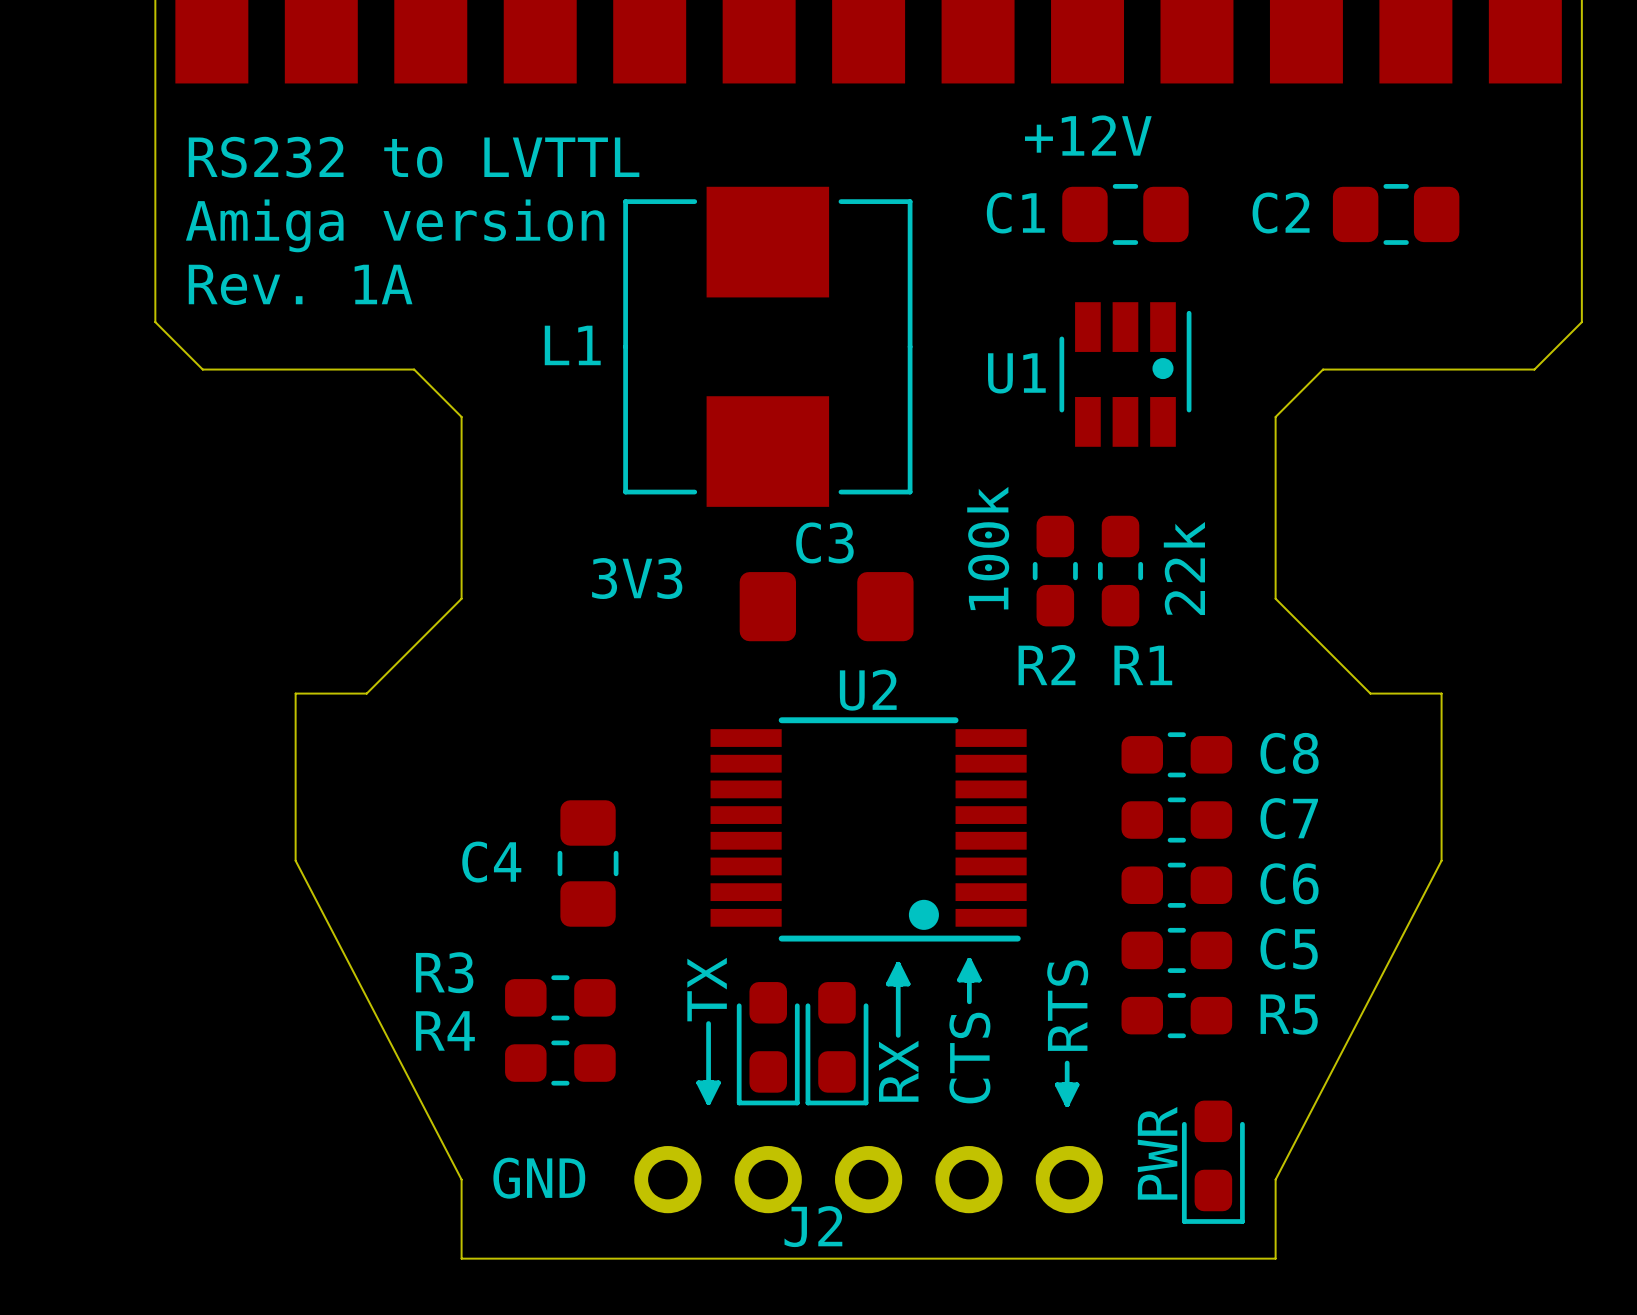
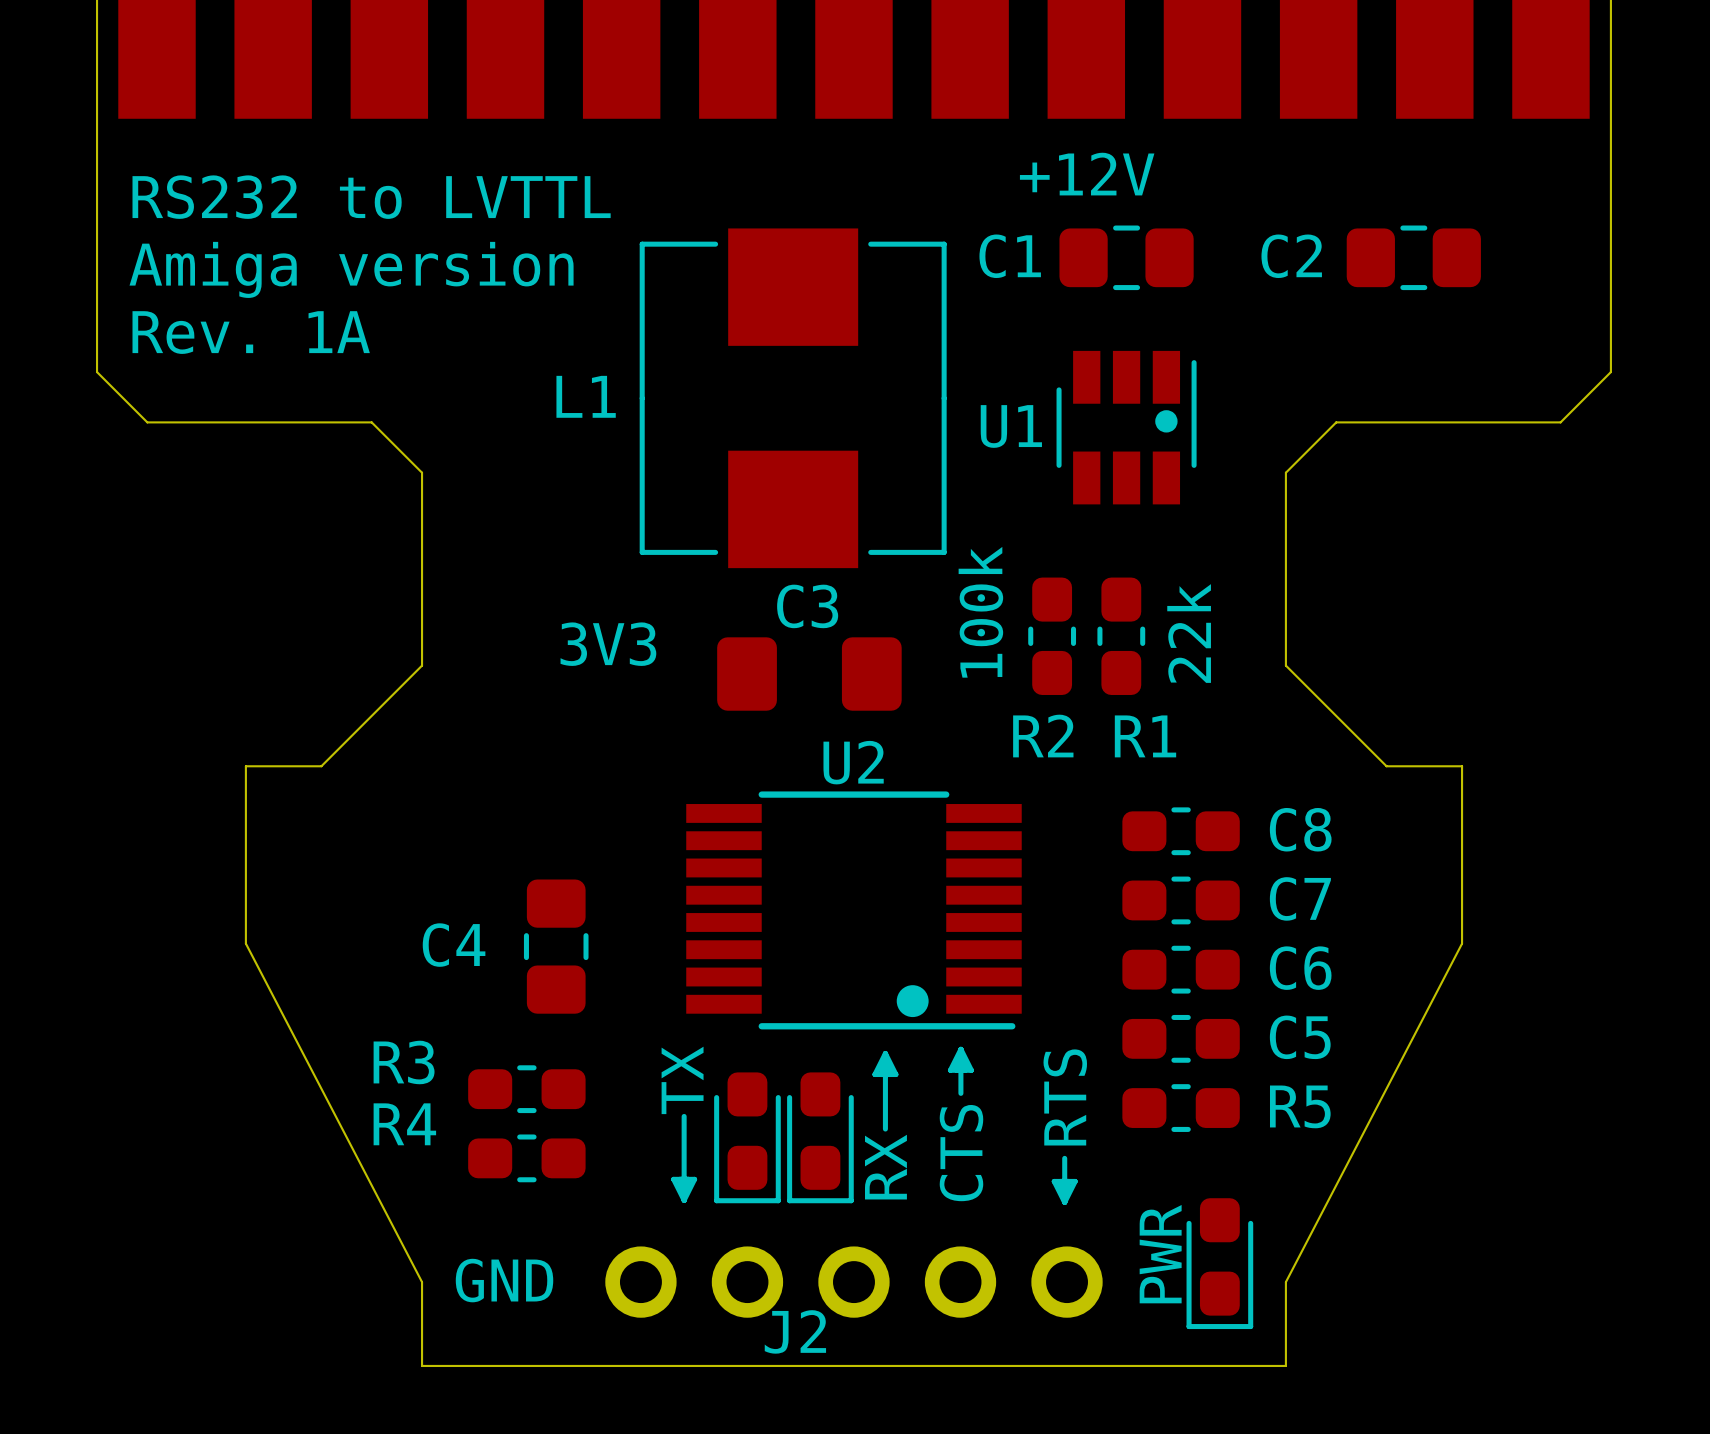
L1 position: (767, 346) -> (793, 398)

